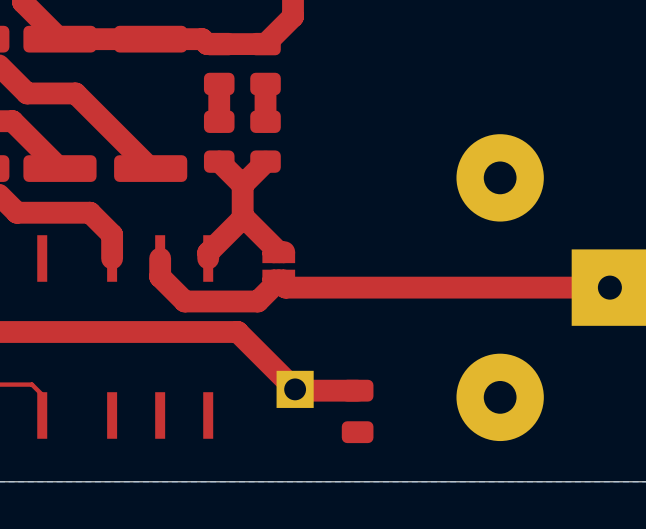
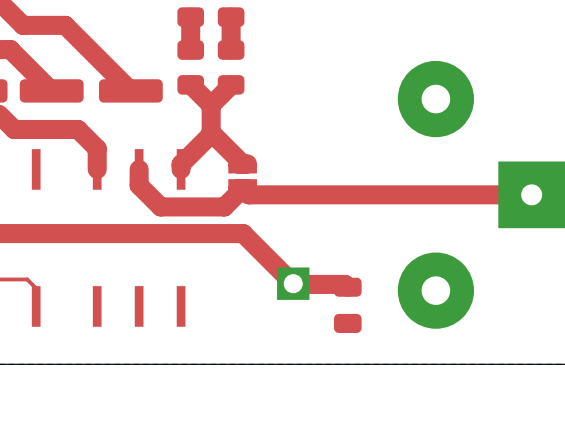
top track: (237, 332) (296, 390) (357, 390) -> (206, 233) (243, 233) (294, 284) (345, 284) (347, 287)
part position: (295, 389) -> (293, 283)
part position: (357, 411) -> (347, 305)

